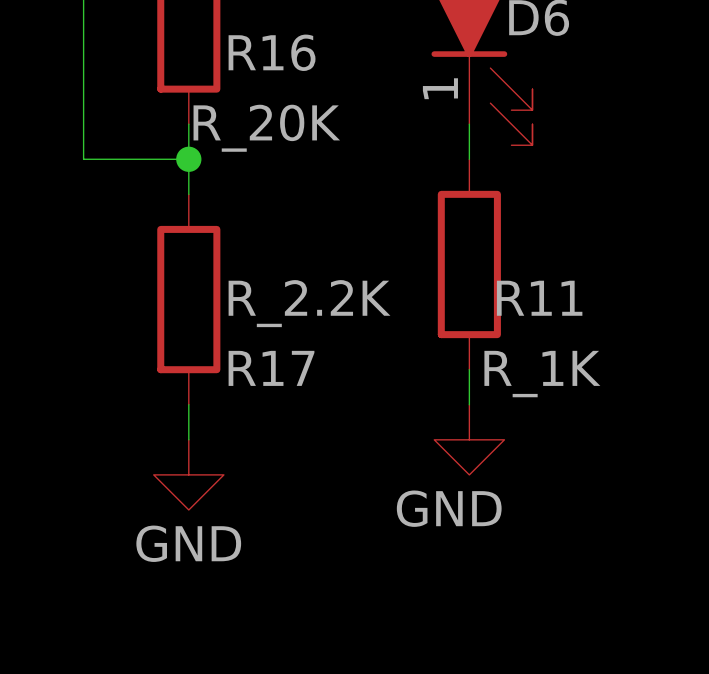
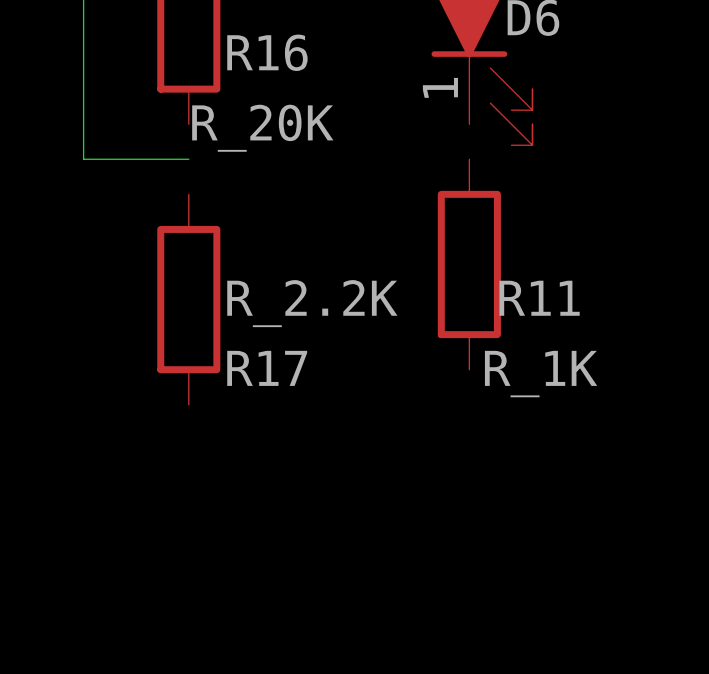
wire: (188, 124) (188, 194) -> none
wire: (469, 124) (469, 159) -> none
junction: (188, 159) -> none
wire: (469, 369) (469, 404) -> none
wire: (188, 404) (188, 439) -> none
power symbol: GND (469, 439) -> none
power symbol: GND (188, 474) -> none

